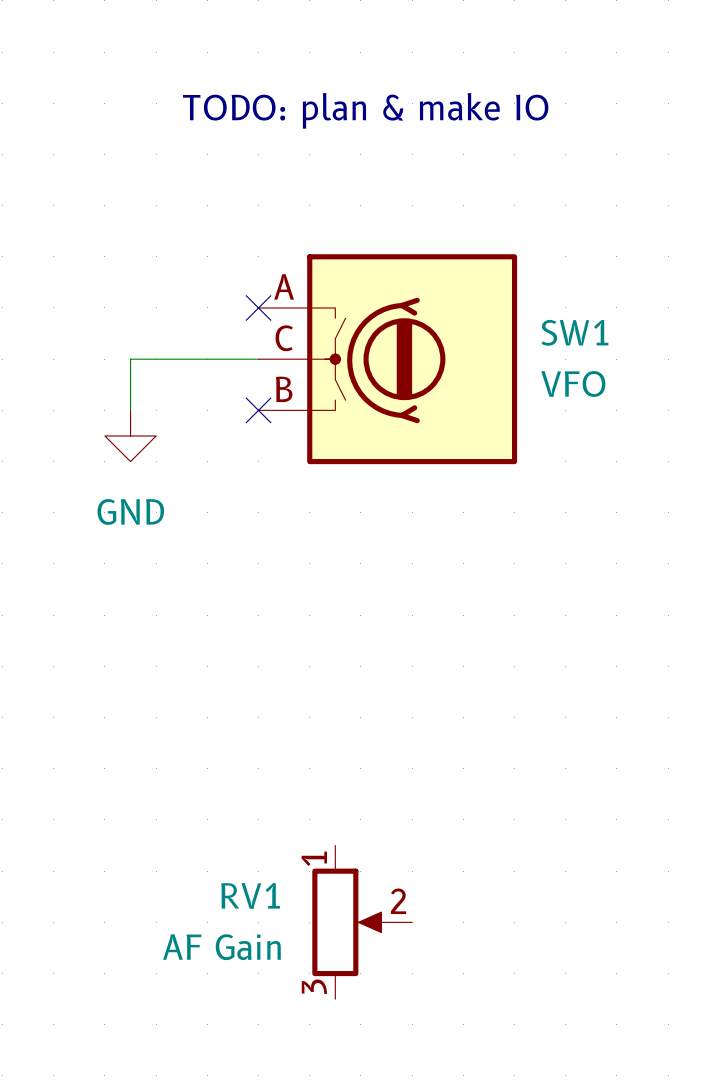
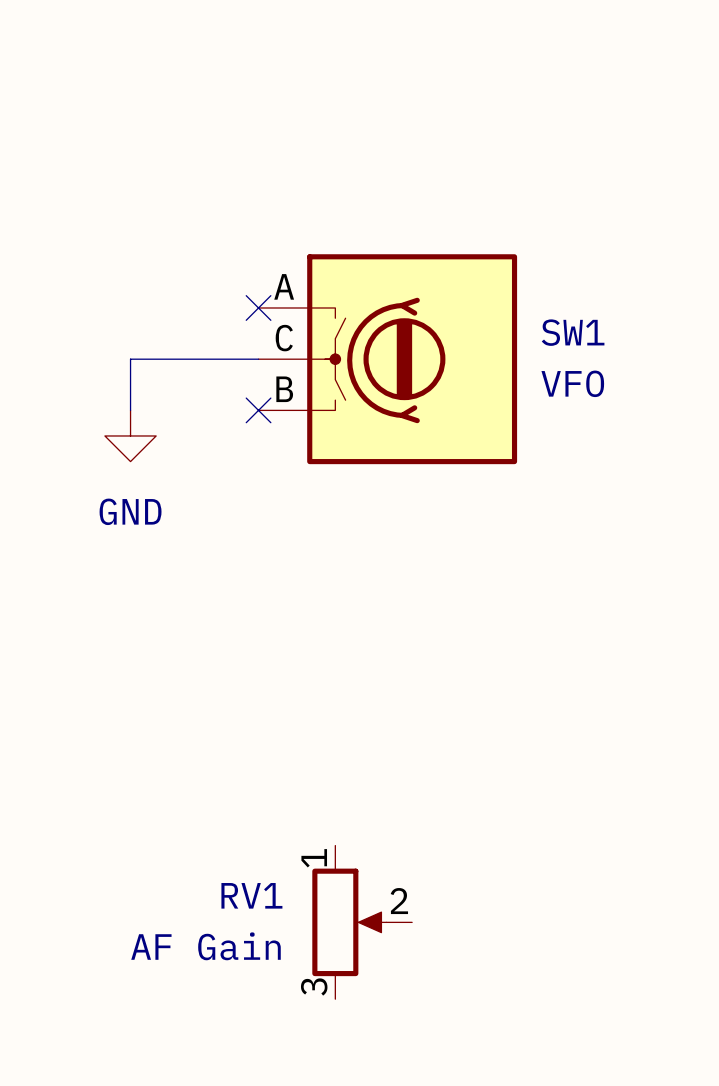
text: TODO: plan & make IO (365, 110) -> none

